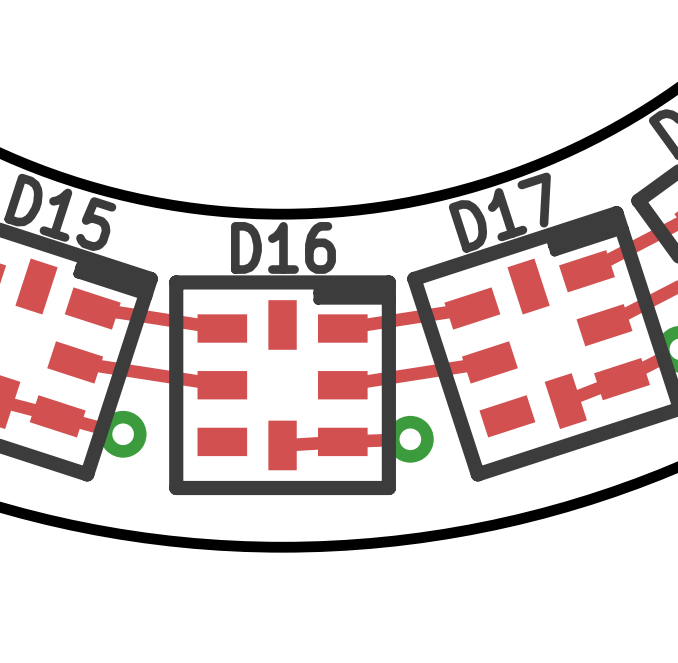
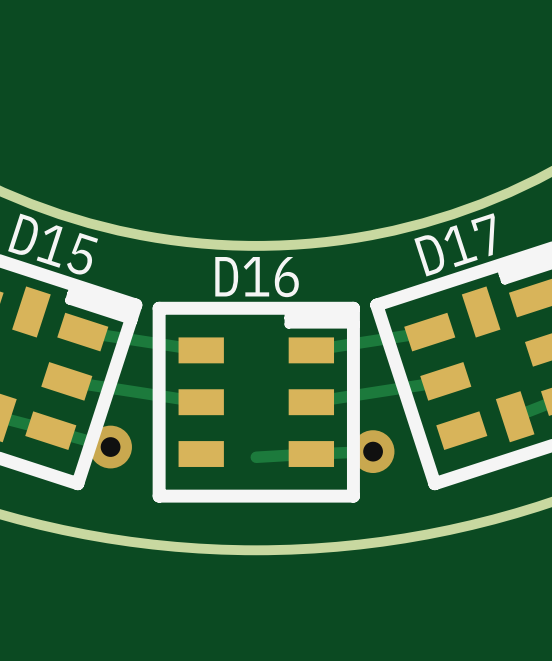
D16 footprint: [169, 275, 396, 496] -> [152, 301, 360, 503]

